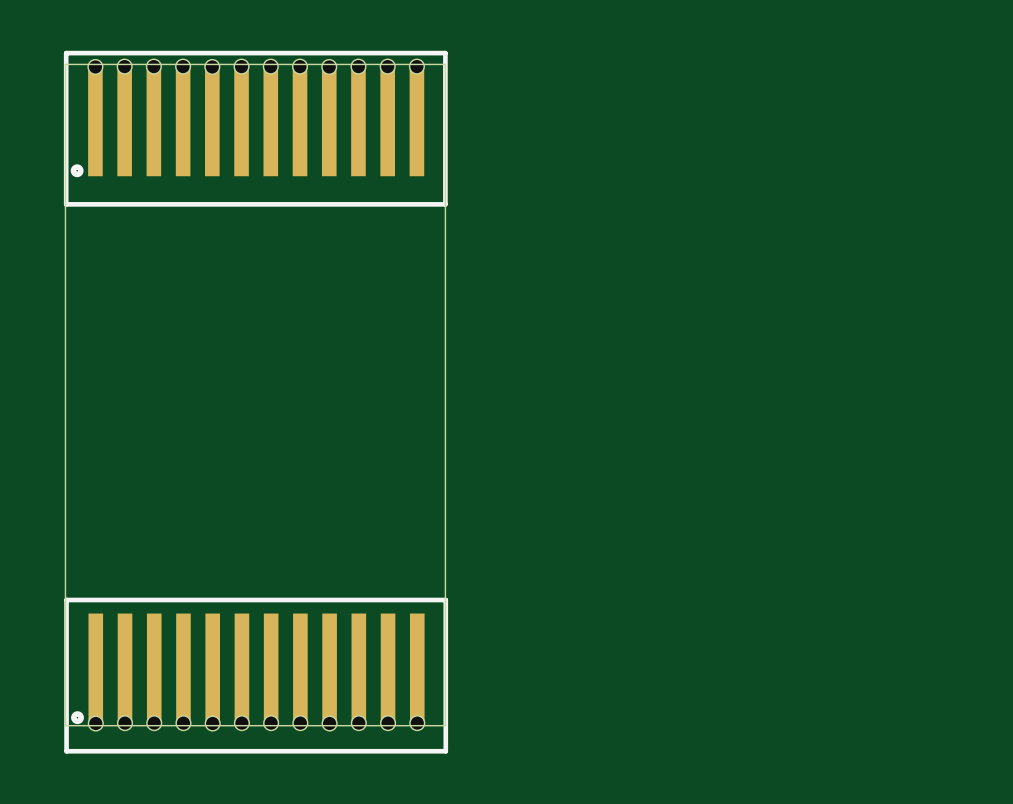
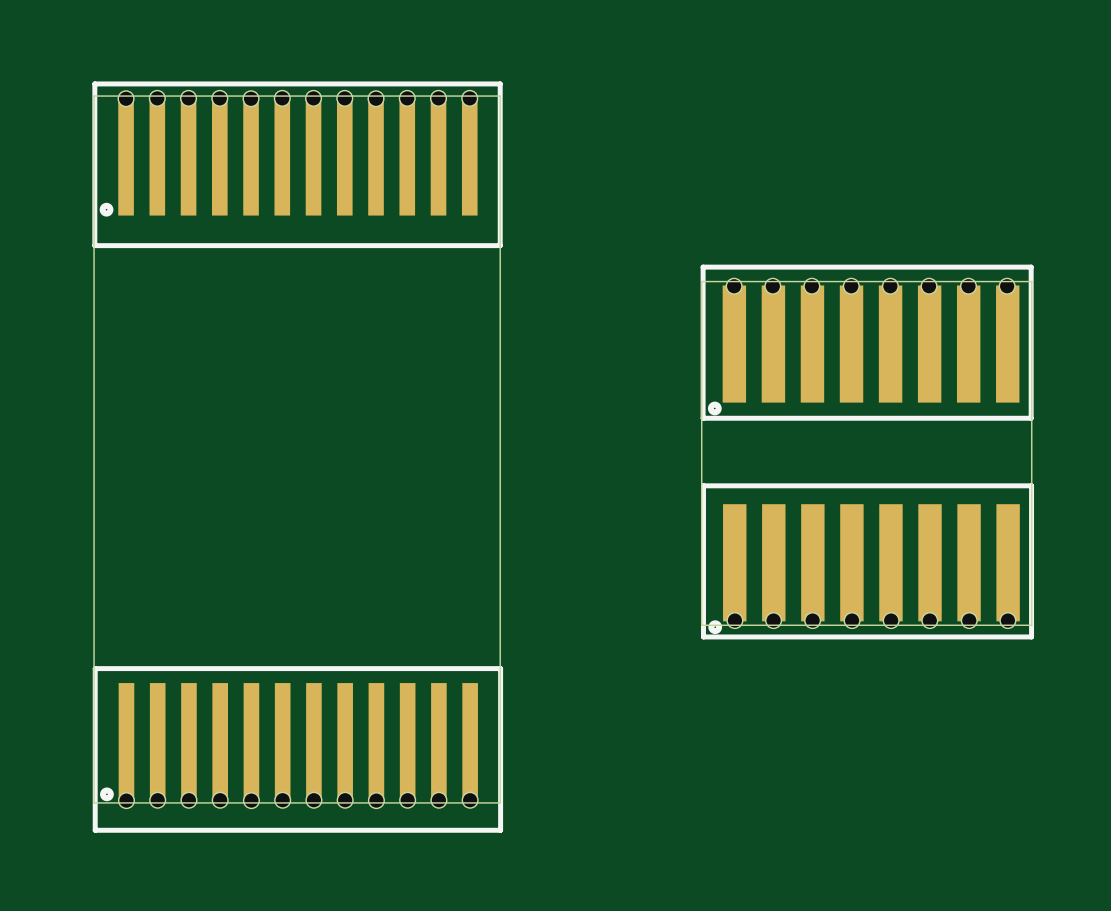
board edge: none -> (701, 281) (1031, 281) (1031, 625) (701, 625) (701, 281)
hole: none -> (734, 286)
hole: none -> (772, 286)
hole: none -> (811, 286)
hole: none -> (851, 286)
hole: none -> (890, 286)
hole: none -> (929, 286)
hole: none -> (968, 286)
hole: none -> (1007, 286)
part: none -> (867, 342)
part: none -> (867, 561)
hole: none -> (734, 620)
hole: none -> (773, 620)
hole: none -> (812, 620)
hole: none -> (852, 620)
hole: none -> (891, 620)
hole: none -> (929, 620)
hole: none -> (969, 620)
hole: none -> (1007, 620)

